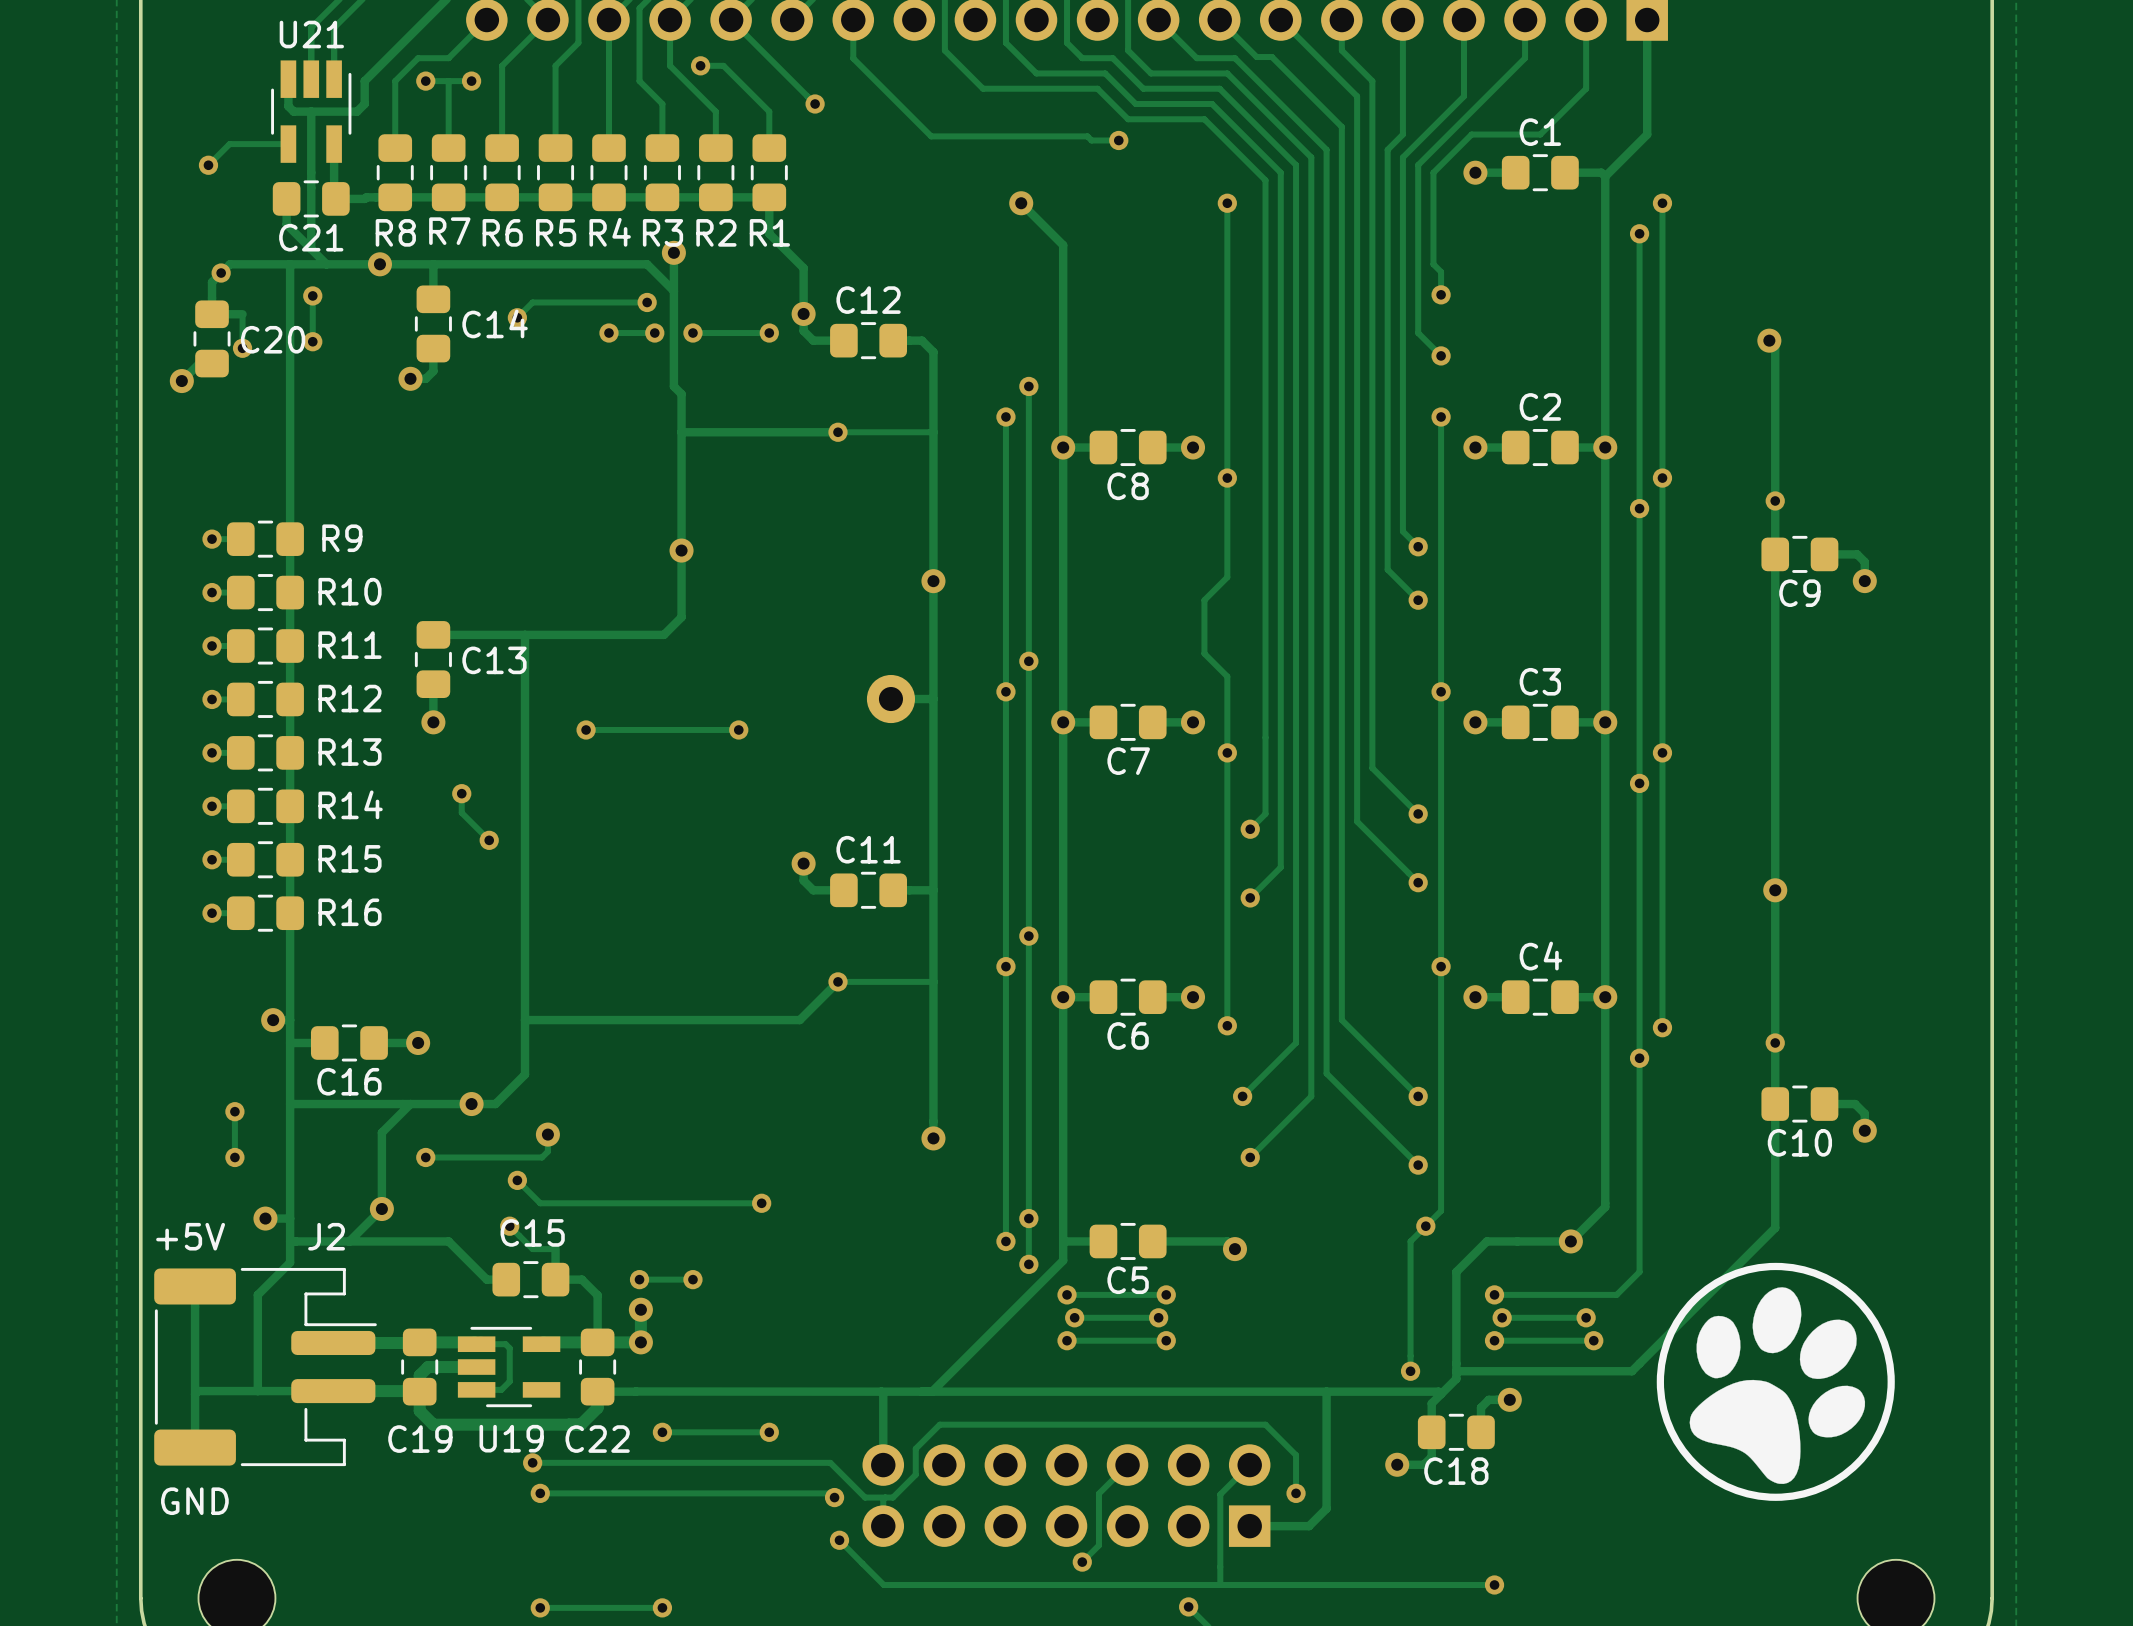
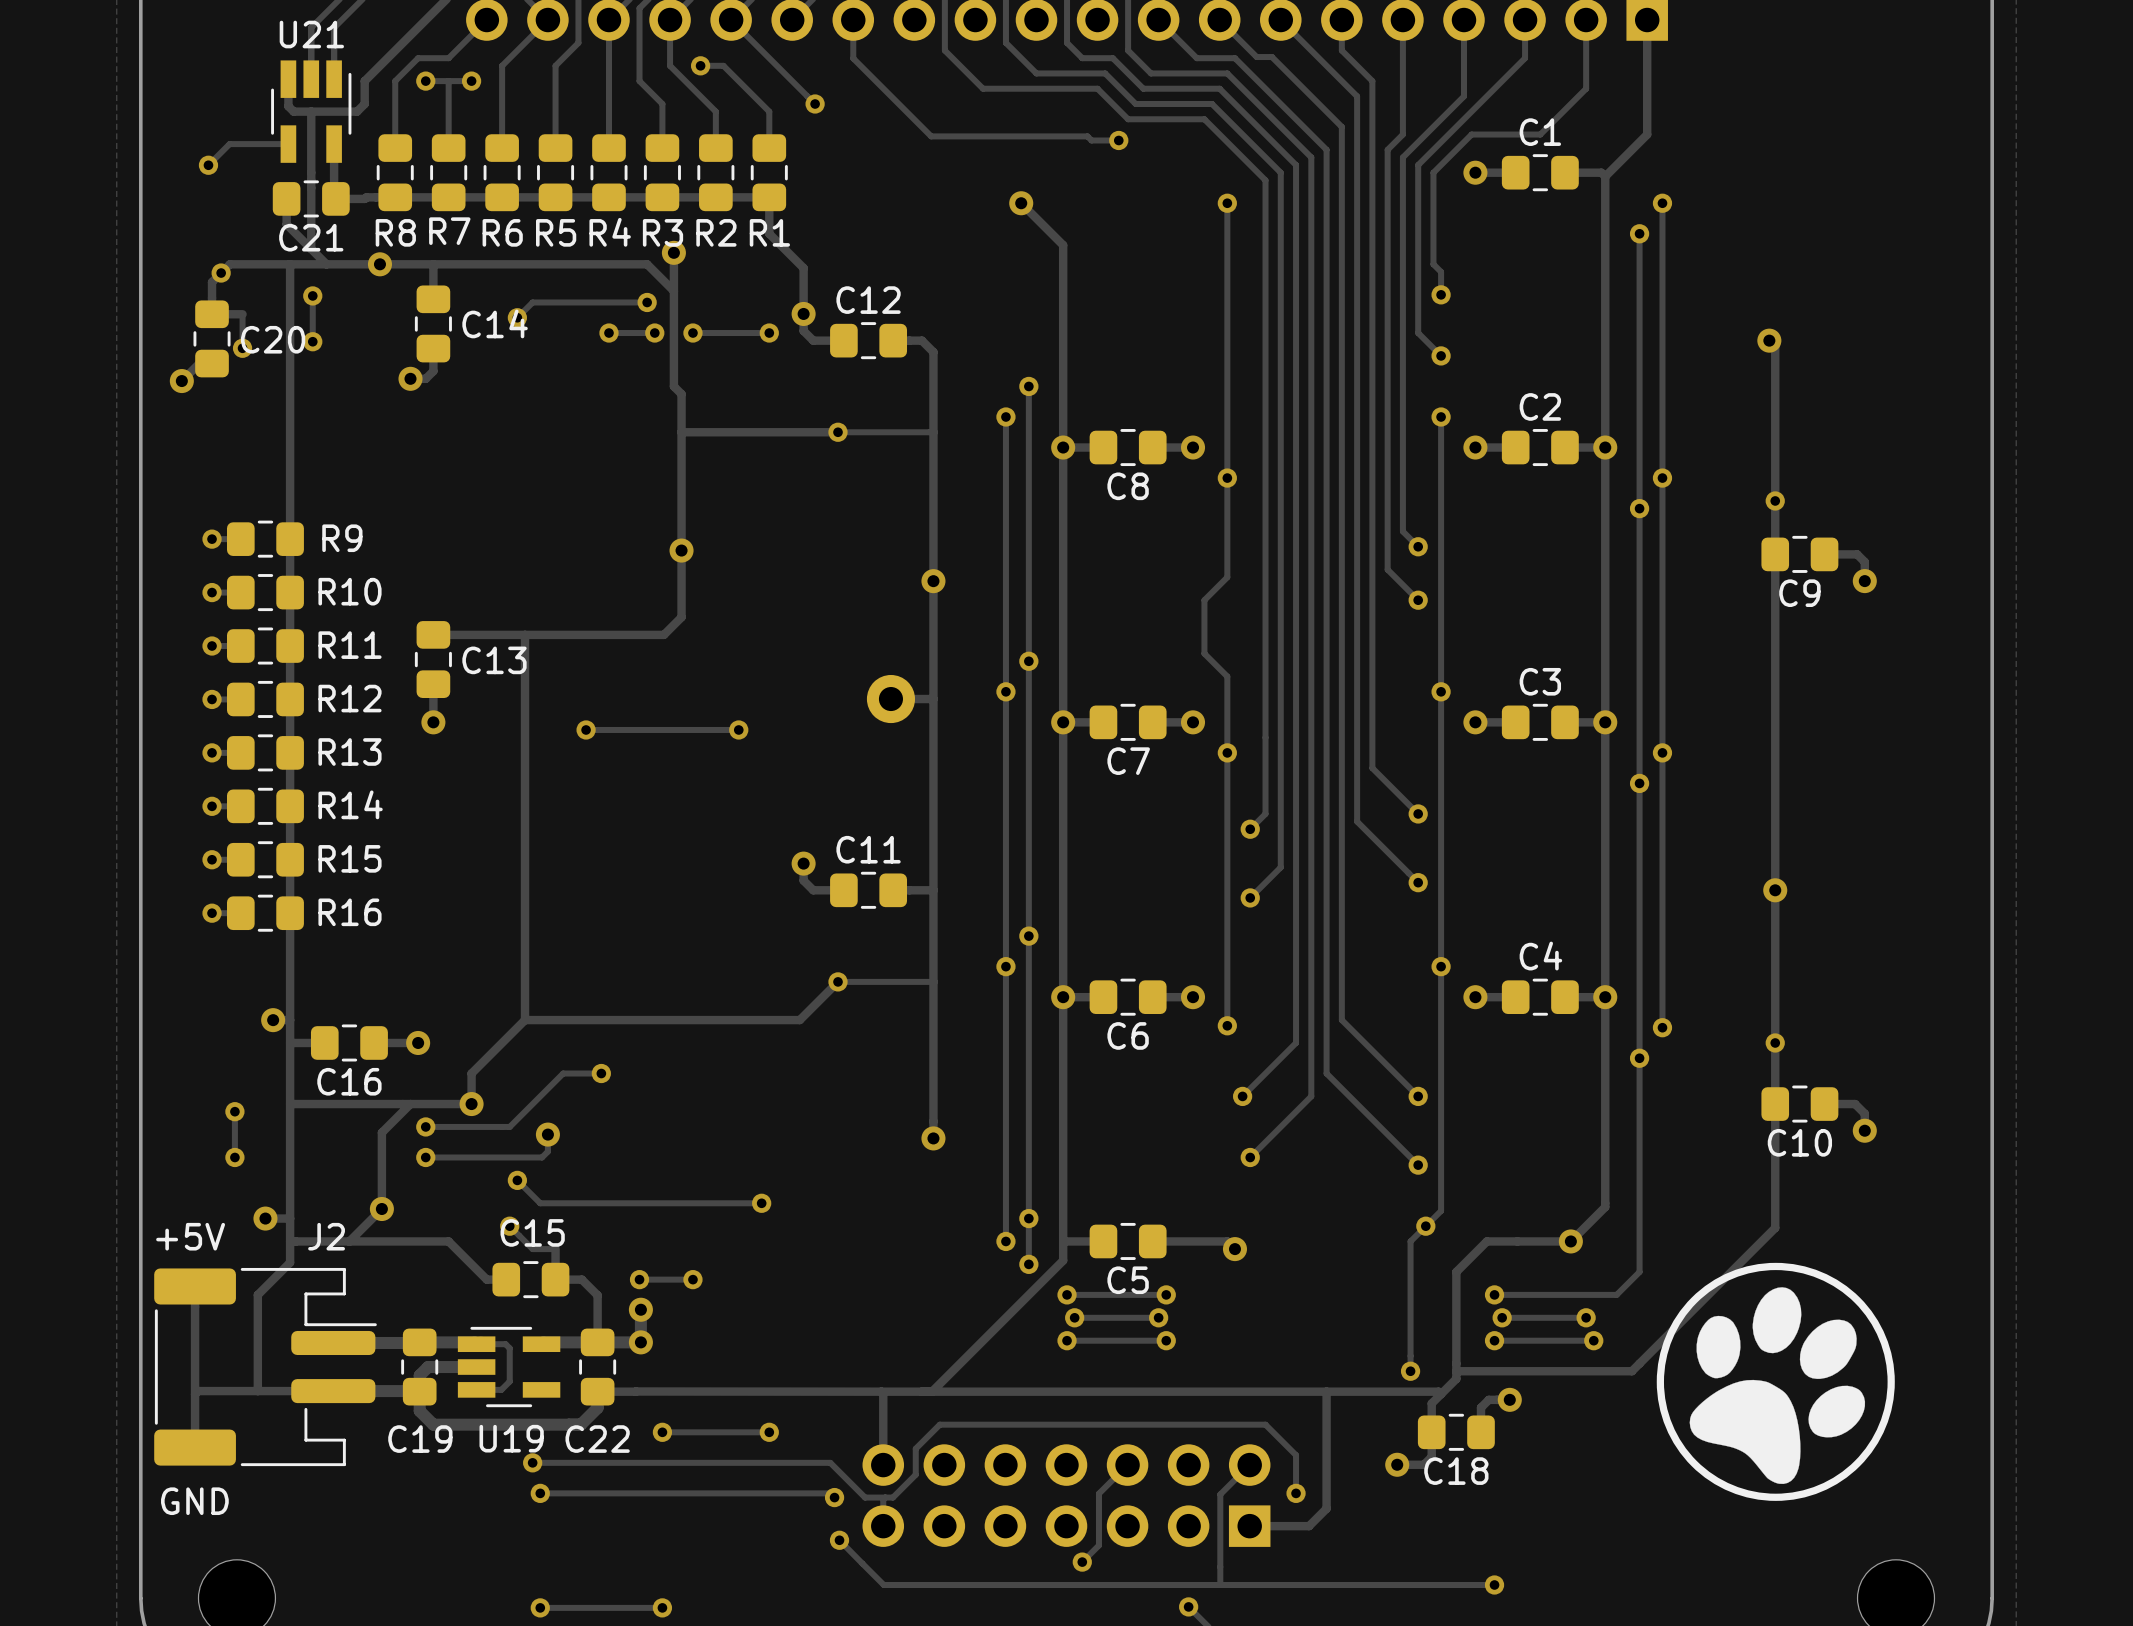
track: (461, 793) (461, 812) (489, 840) -> none
via: (461, 793) -> none
via: (489, 840) -> none
track: (525, 1020) (525, 1074) (495, 1104) (471, 1104) -> (525, 1020) (471, 1073) (471, 1104)
track: none -> (601, 1073) (563, 1073) (509, 1126) (425, 1126)
via: none -> (601, 1073)
via: none -> (425, 1126)

